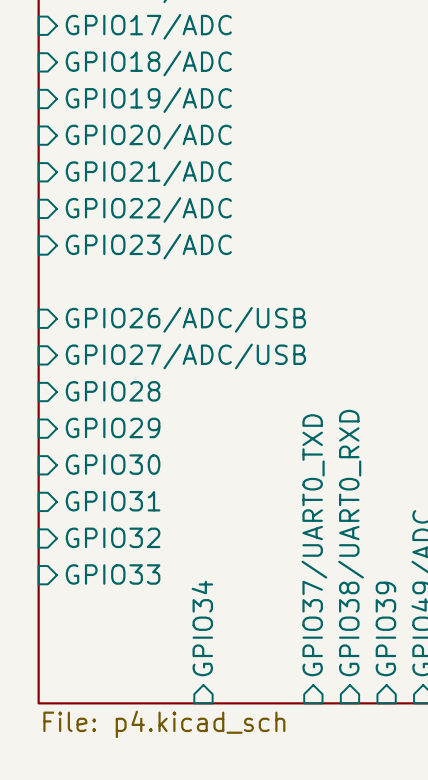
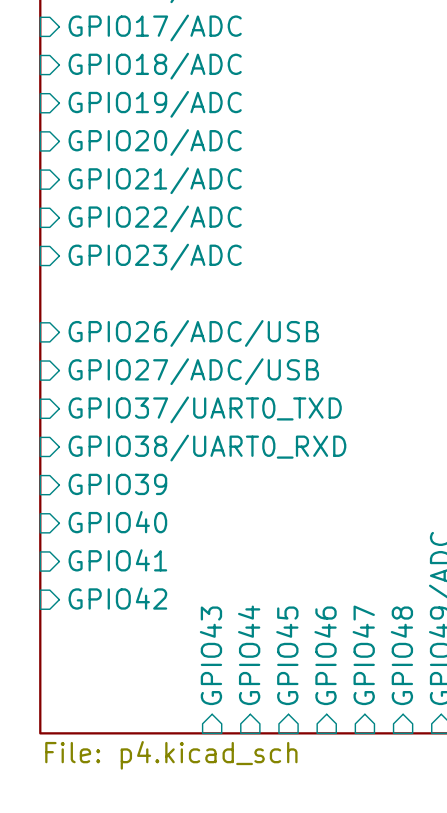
sheet pin: GPIO28 (113, 391) -> GPIO37/UART0_TXD (205, 409)
sheet pin: GPIO29 (113, 427) -> GPIO38/UART0_RXD (207, 448)
sheet pin: GPIO30 (113, 464) -> GPIO39 (117, 484)
sheet pin: GPIO31 (113, 501) -> GPIO40 (117, 522)
sheet pin: GPIO32 (113, 537) -> GPIO41 (117, 560)
sheet pin: GPIO38/UART0_RXD (351, 543) -> GPIO47 (363, 655)
sheet pin: GPIO37/UART0_TXD (314, 545) -> GPIO46 (325, 655)
sheet pin: GPIO33 (113, 574) -> GPIO42 (117, 598)
sheet pin: GPIO34 (202, 628) -> GPIO43 (210, 655)
sheet pin: none -> GPIO44 (249, 655)
sheet pin: none -> GPIO45 (287, 655)
sheet pin: GPIO39 (385, 628) -> GPIO48 (401, 655)

